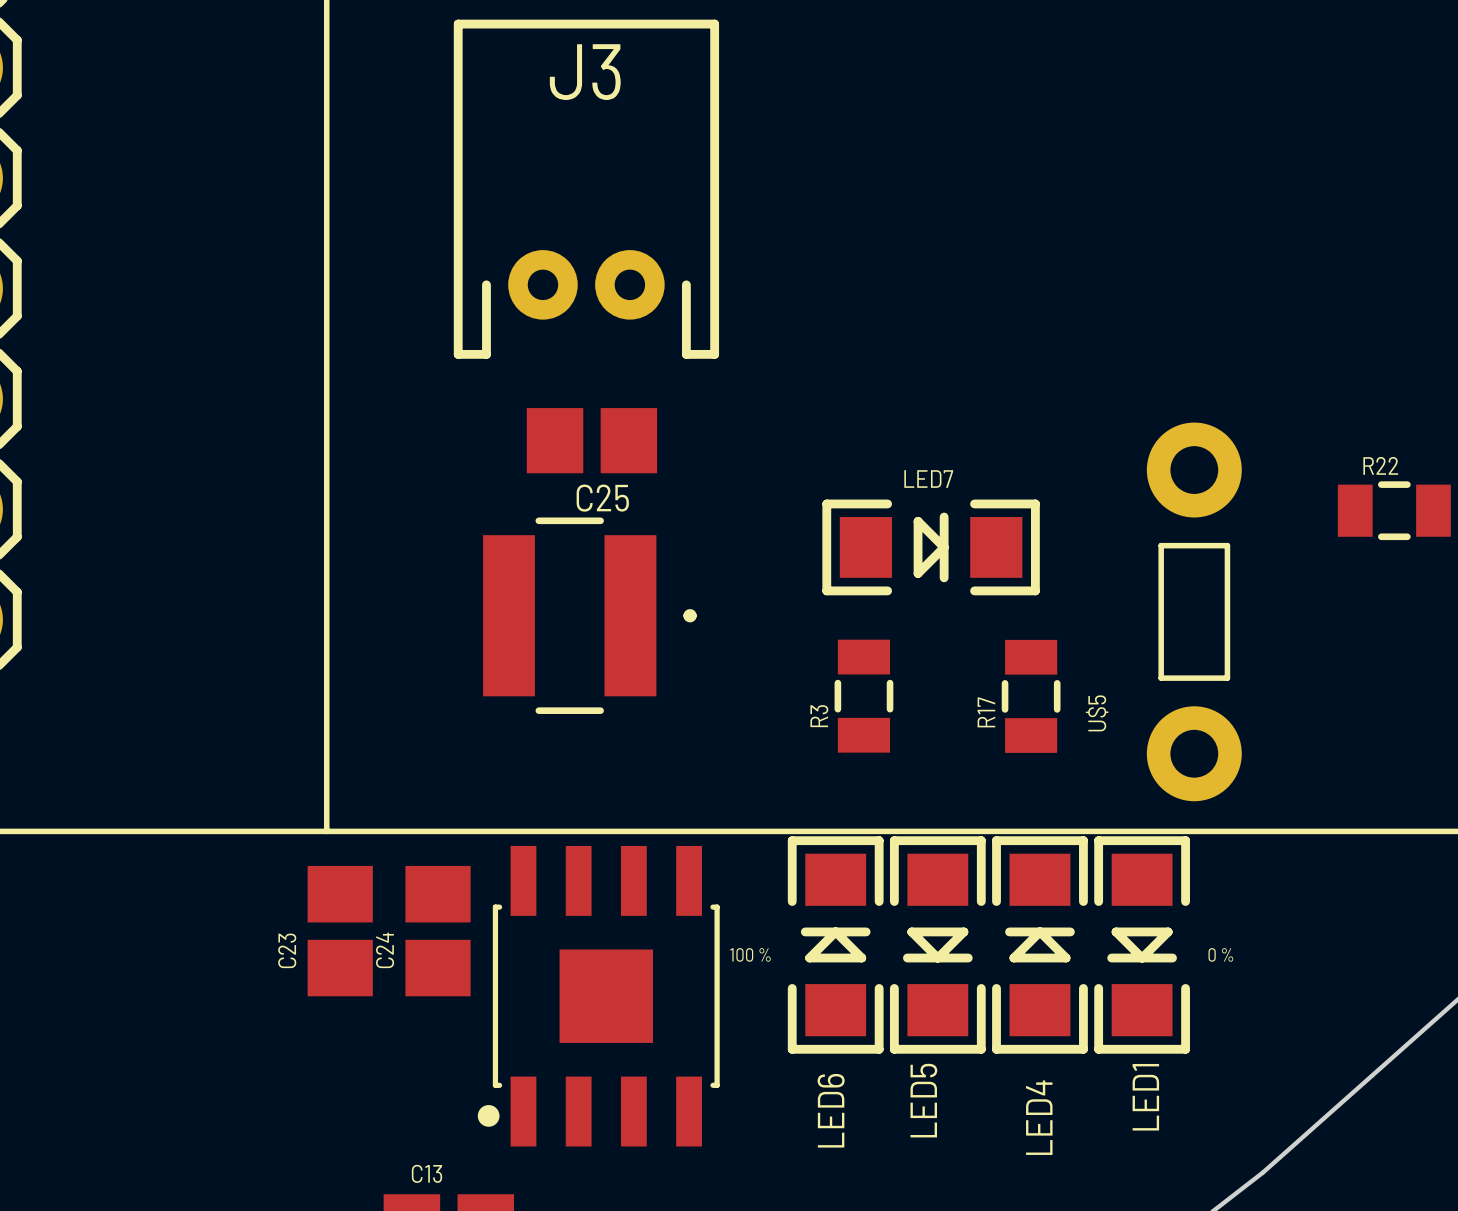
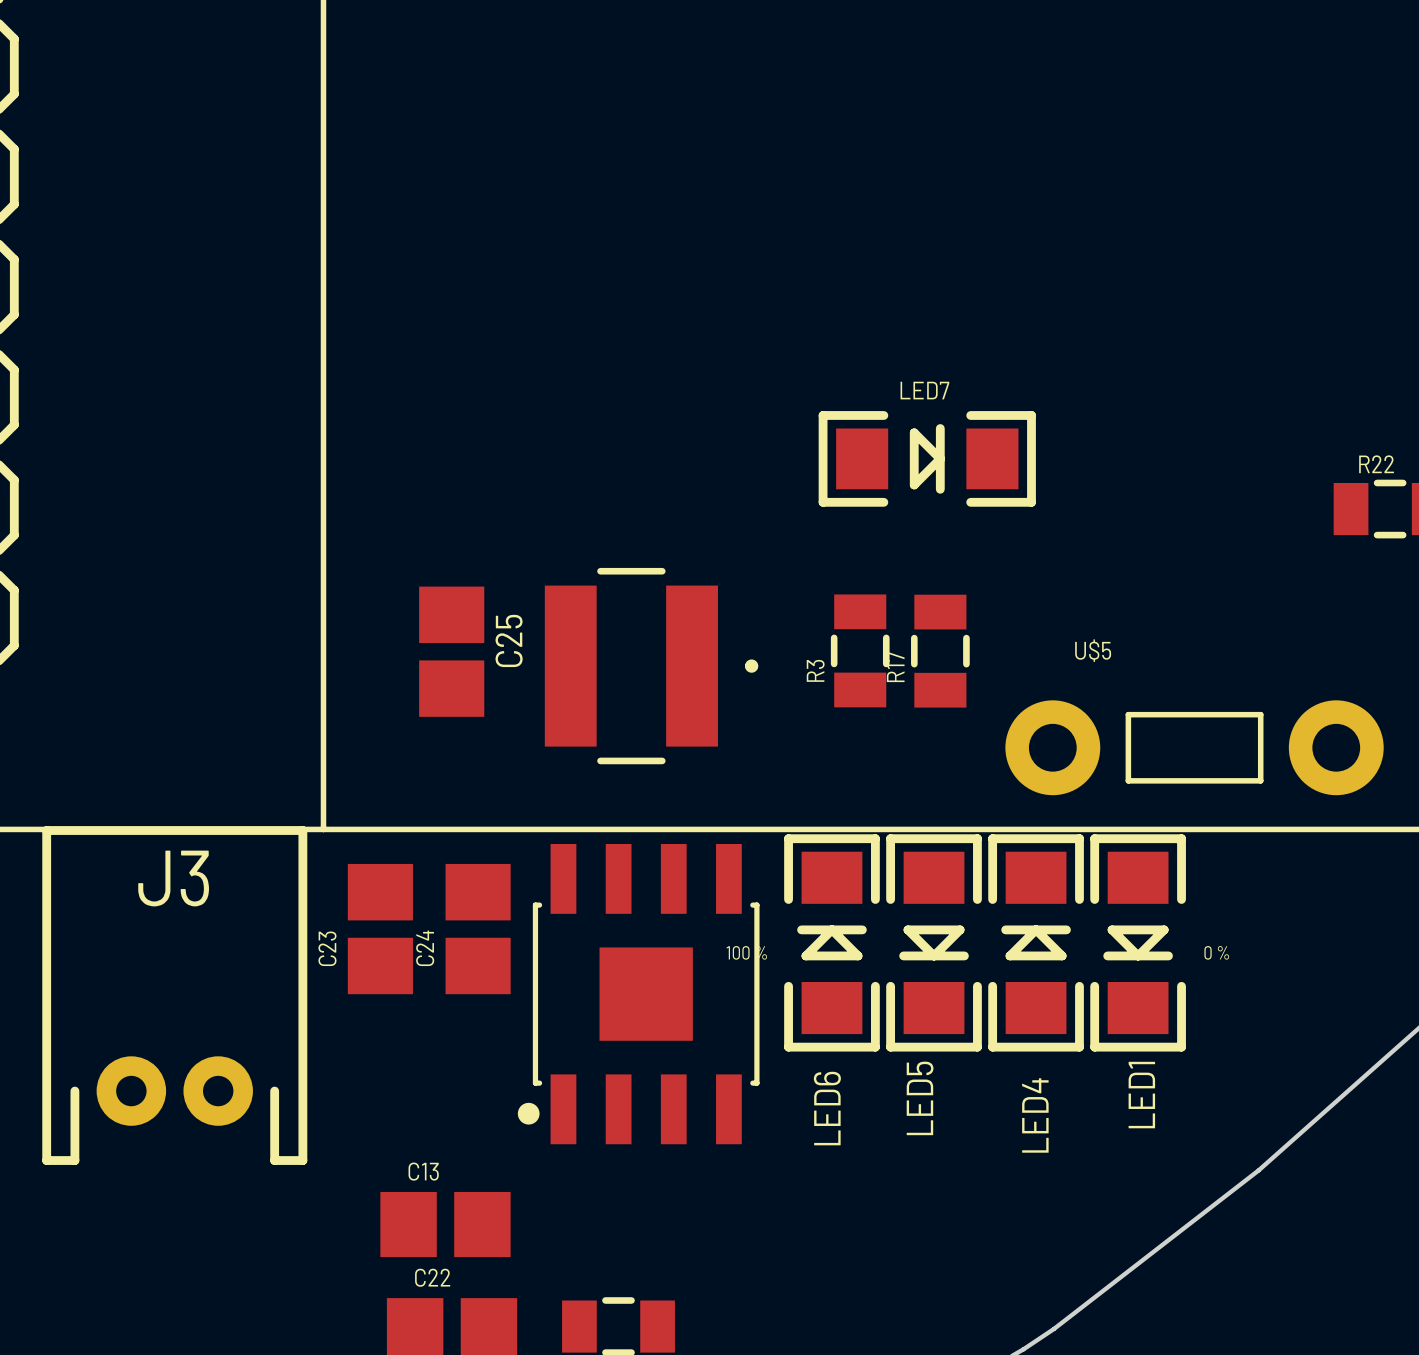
J3 position: (586, 189) -> (174, 995)
C25 rotation: 0° (591, 440) -> 90° clockwise (451, 651)
C25 position: (591, 440) -> (451, 651)
LED7 position: (931, 547) -> (927, 458)
U$5 rotation: 0° (1194, 611) -> 90° clockwise (1194, 747)
part position: (589, 615) -> (651, 666)
R3 position: (863, 696) -> (860, 650)
R17 position: (1031, 696) -> (940, 651)
C23 position: (340, 931) -> (380, 929)
C24 position: (438, 931) -> (478, 929)
part position: (598, 996) -> (638, 994)

